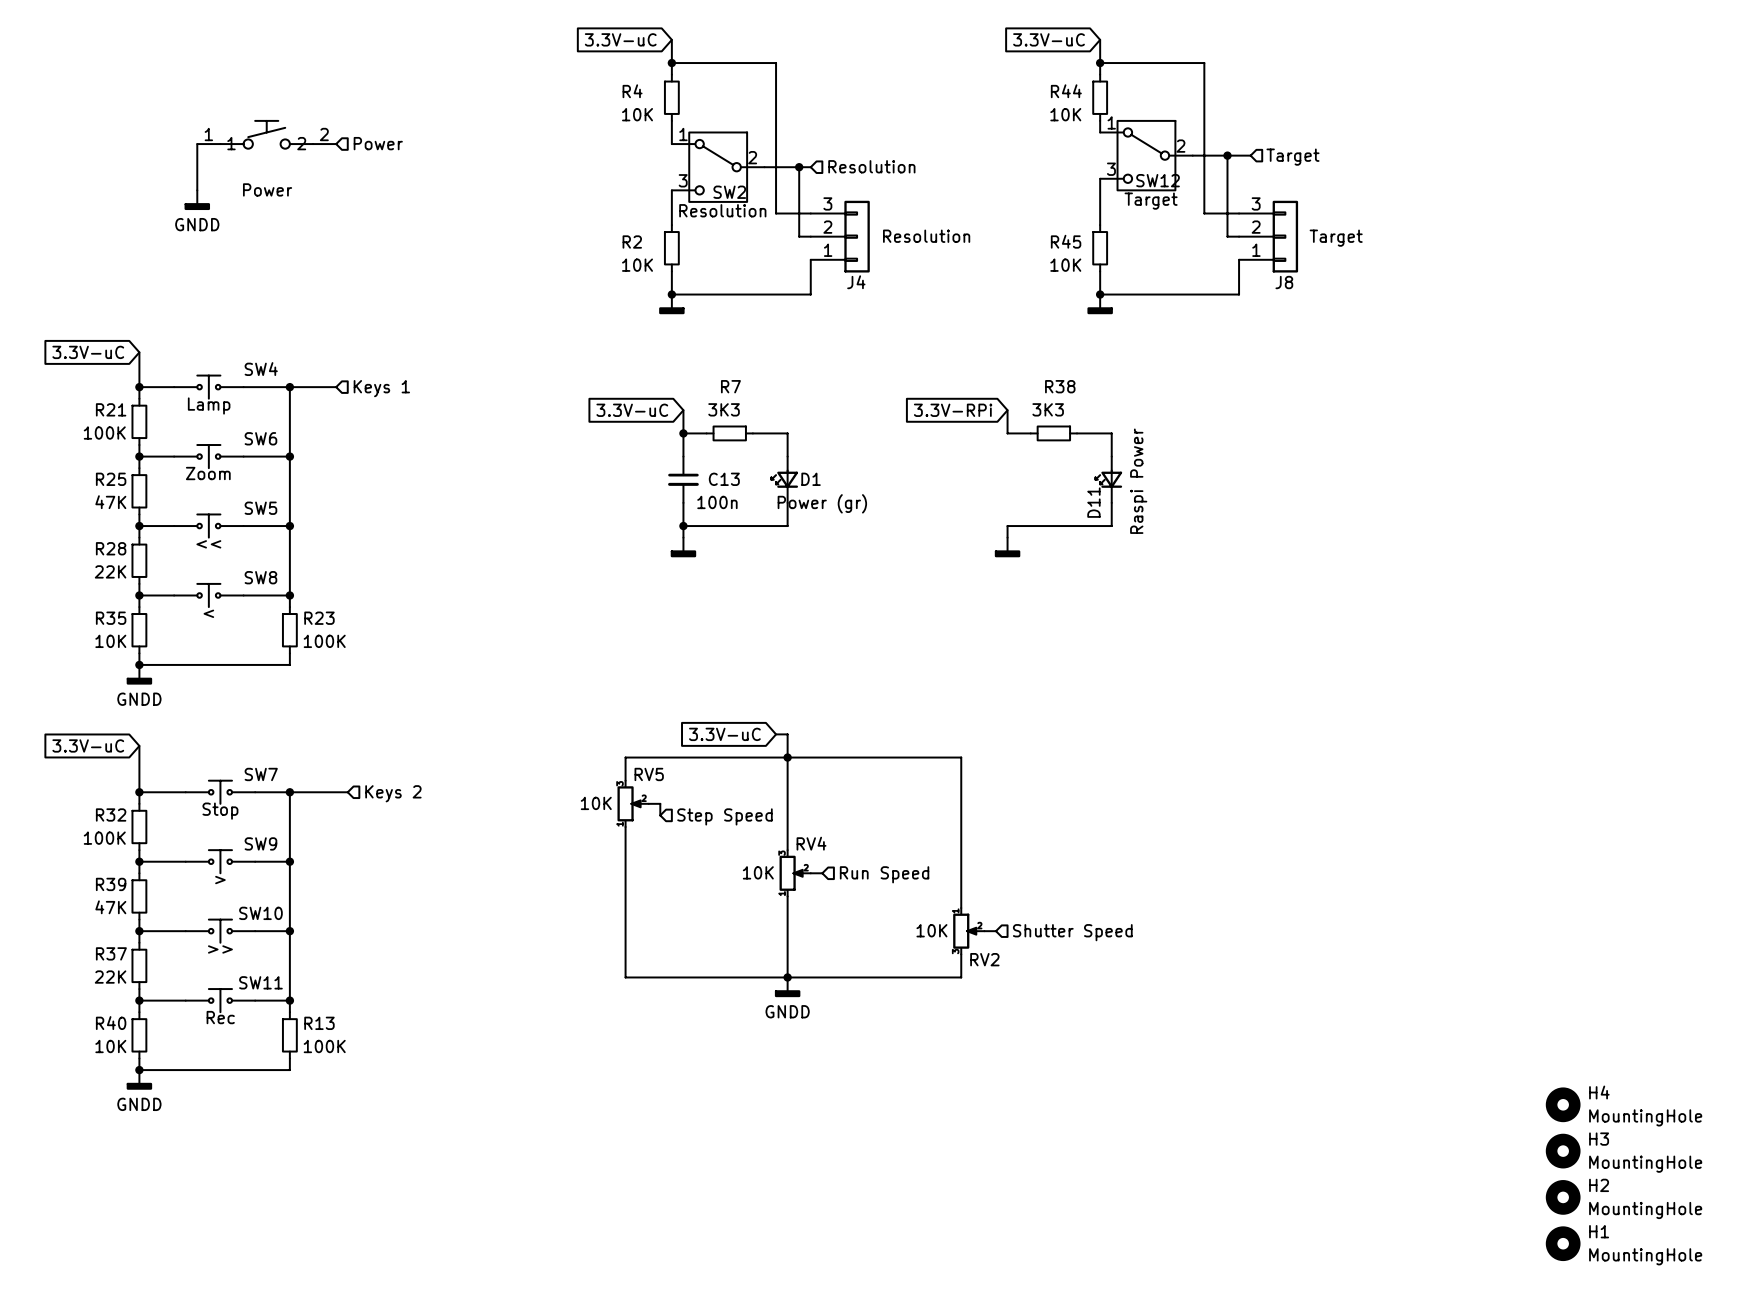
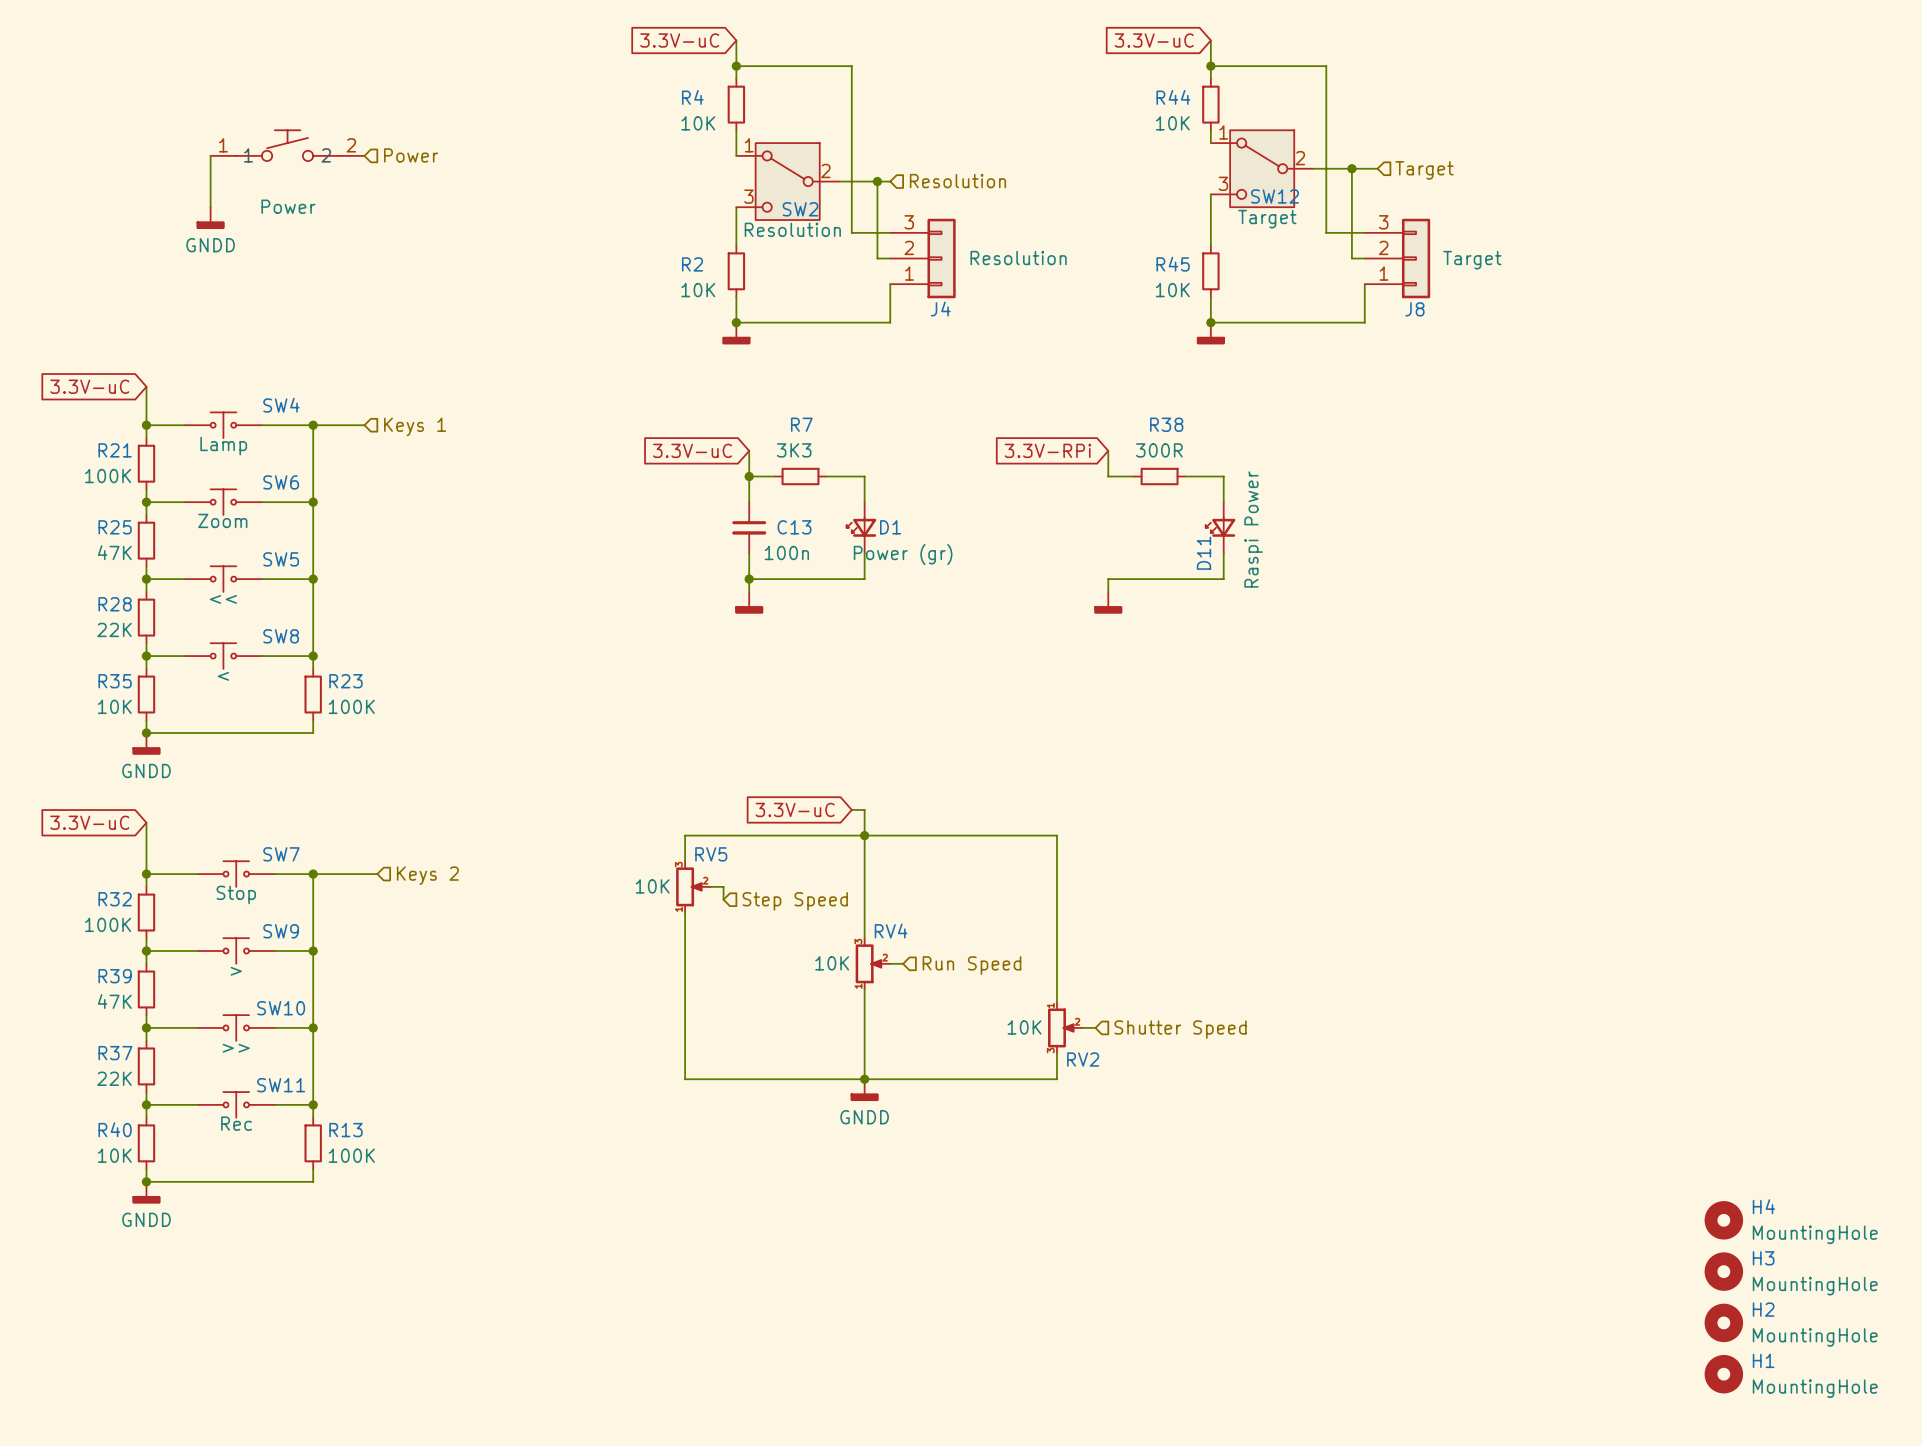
R38 value: 3K3 (1048, 409) -> 300R (1159, 450)

